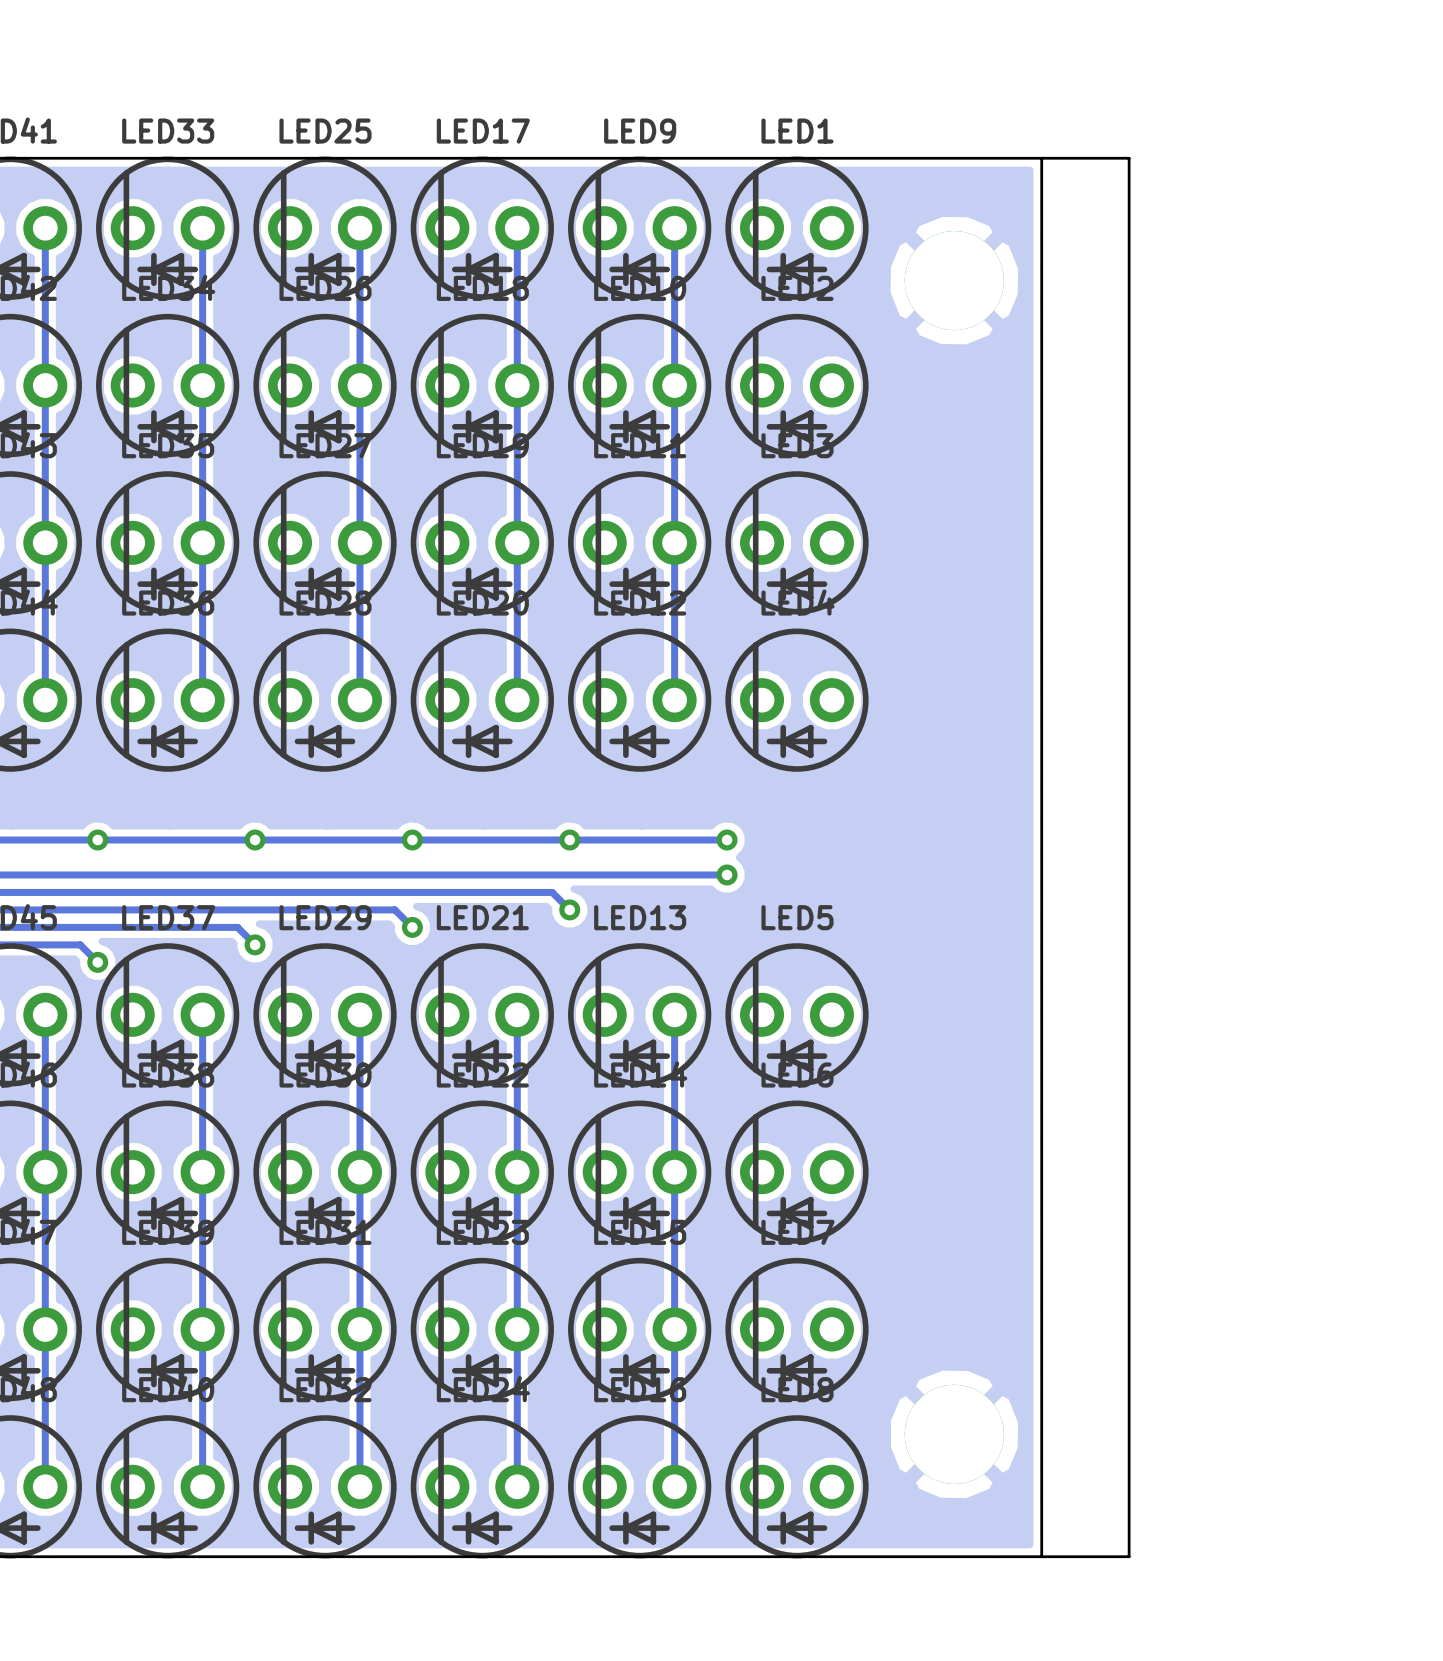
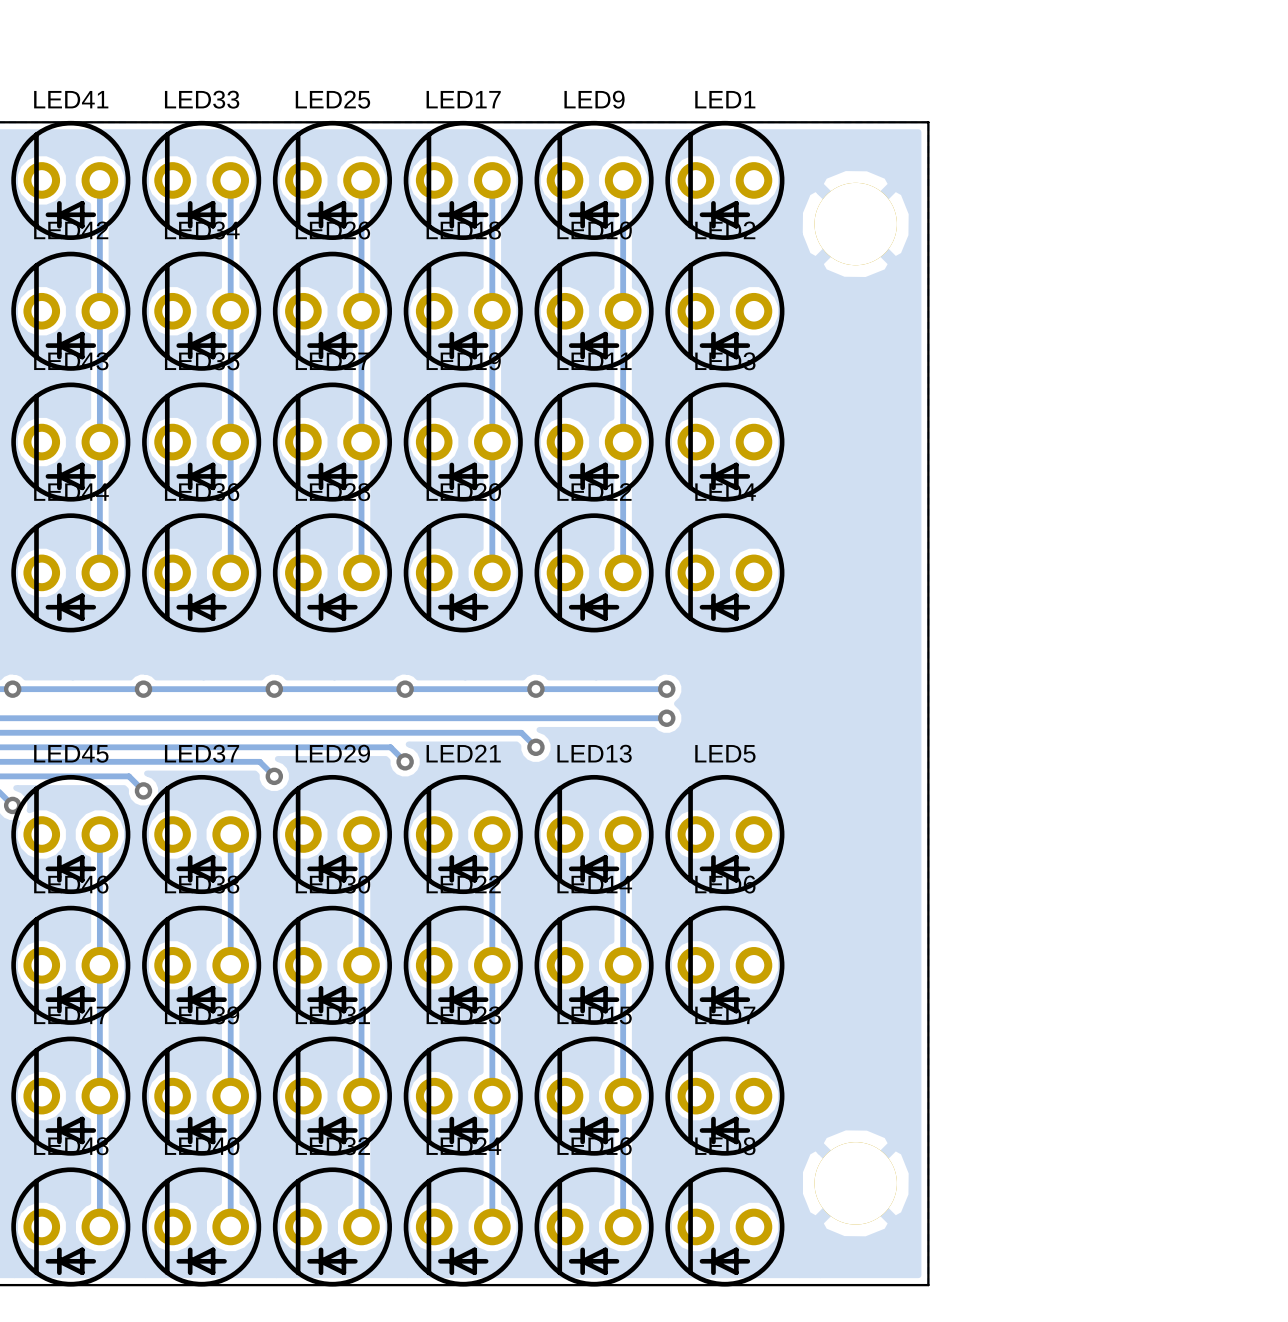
board edge: (1041, 158) (1129, 158) (1129, 1556) (1041, 1556) -> none

